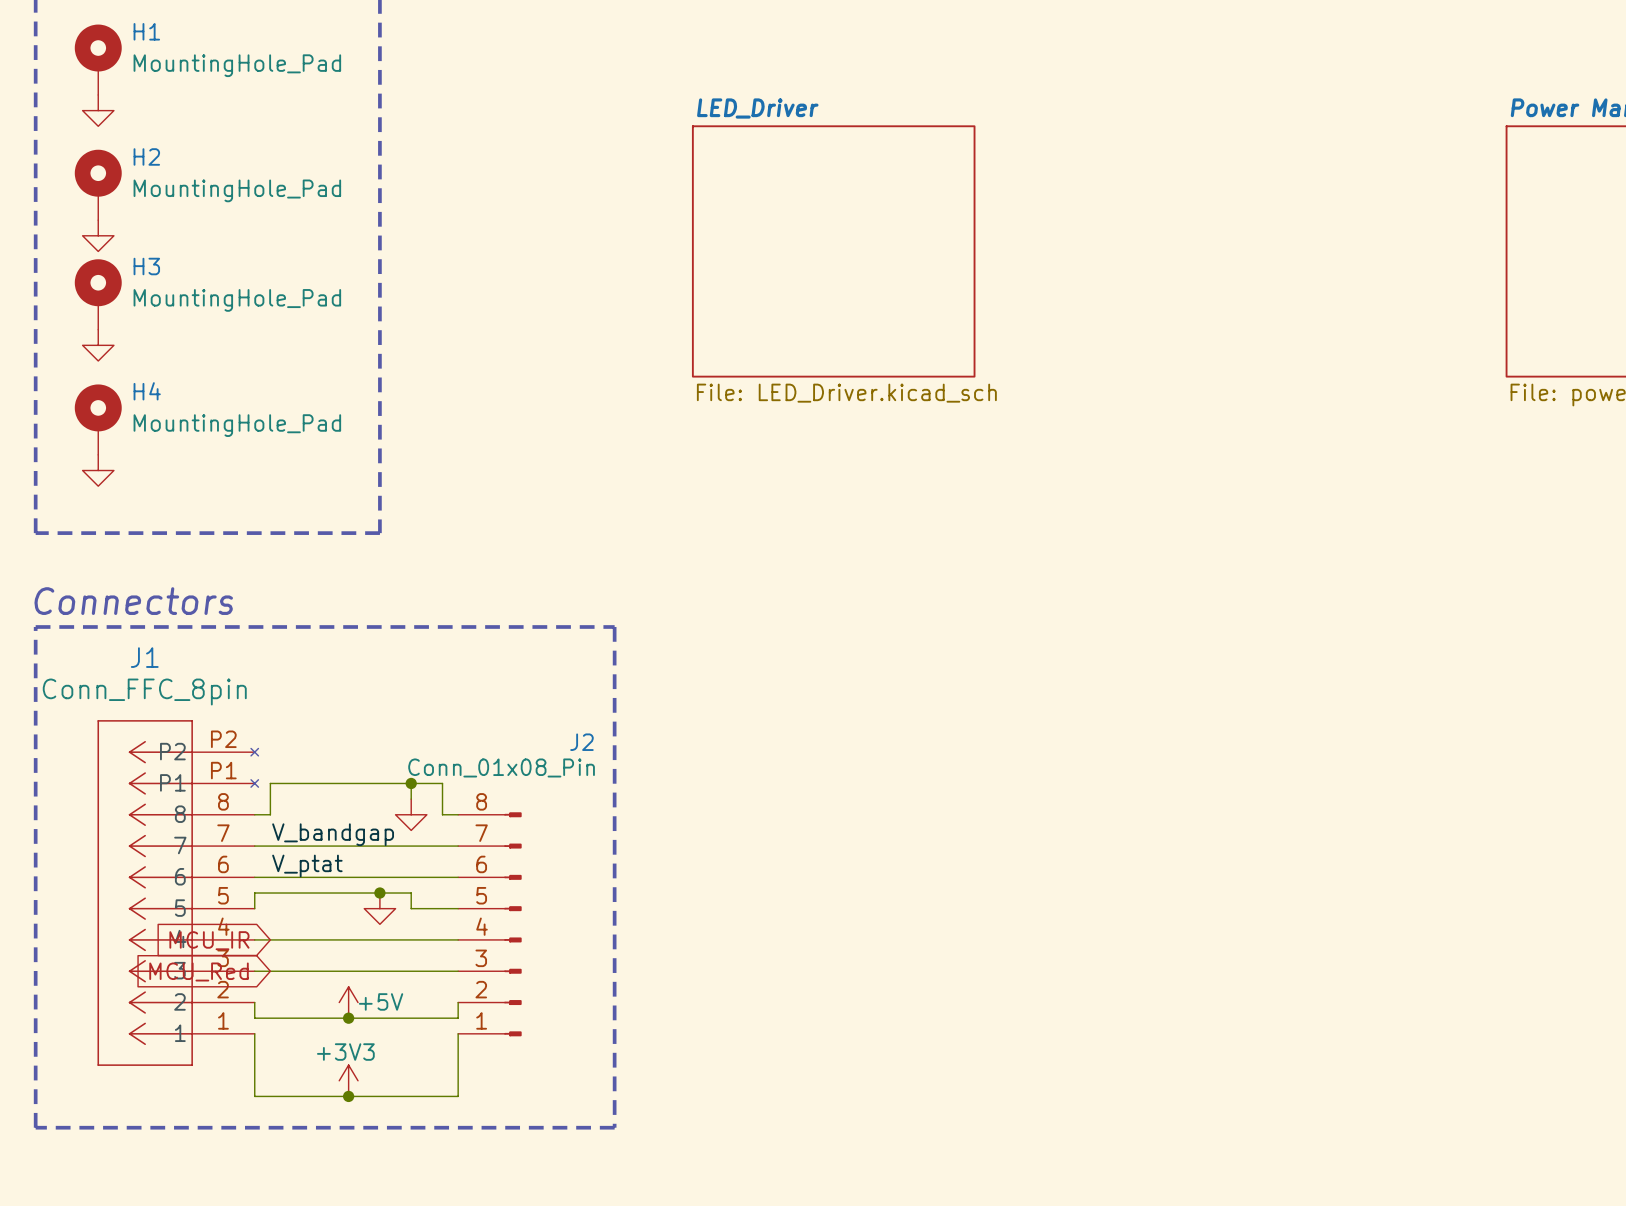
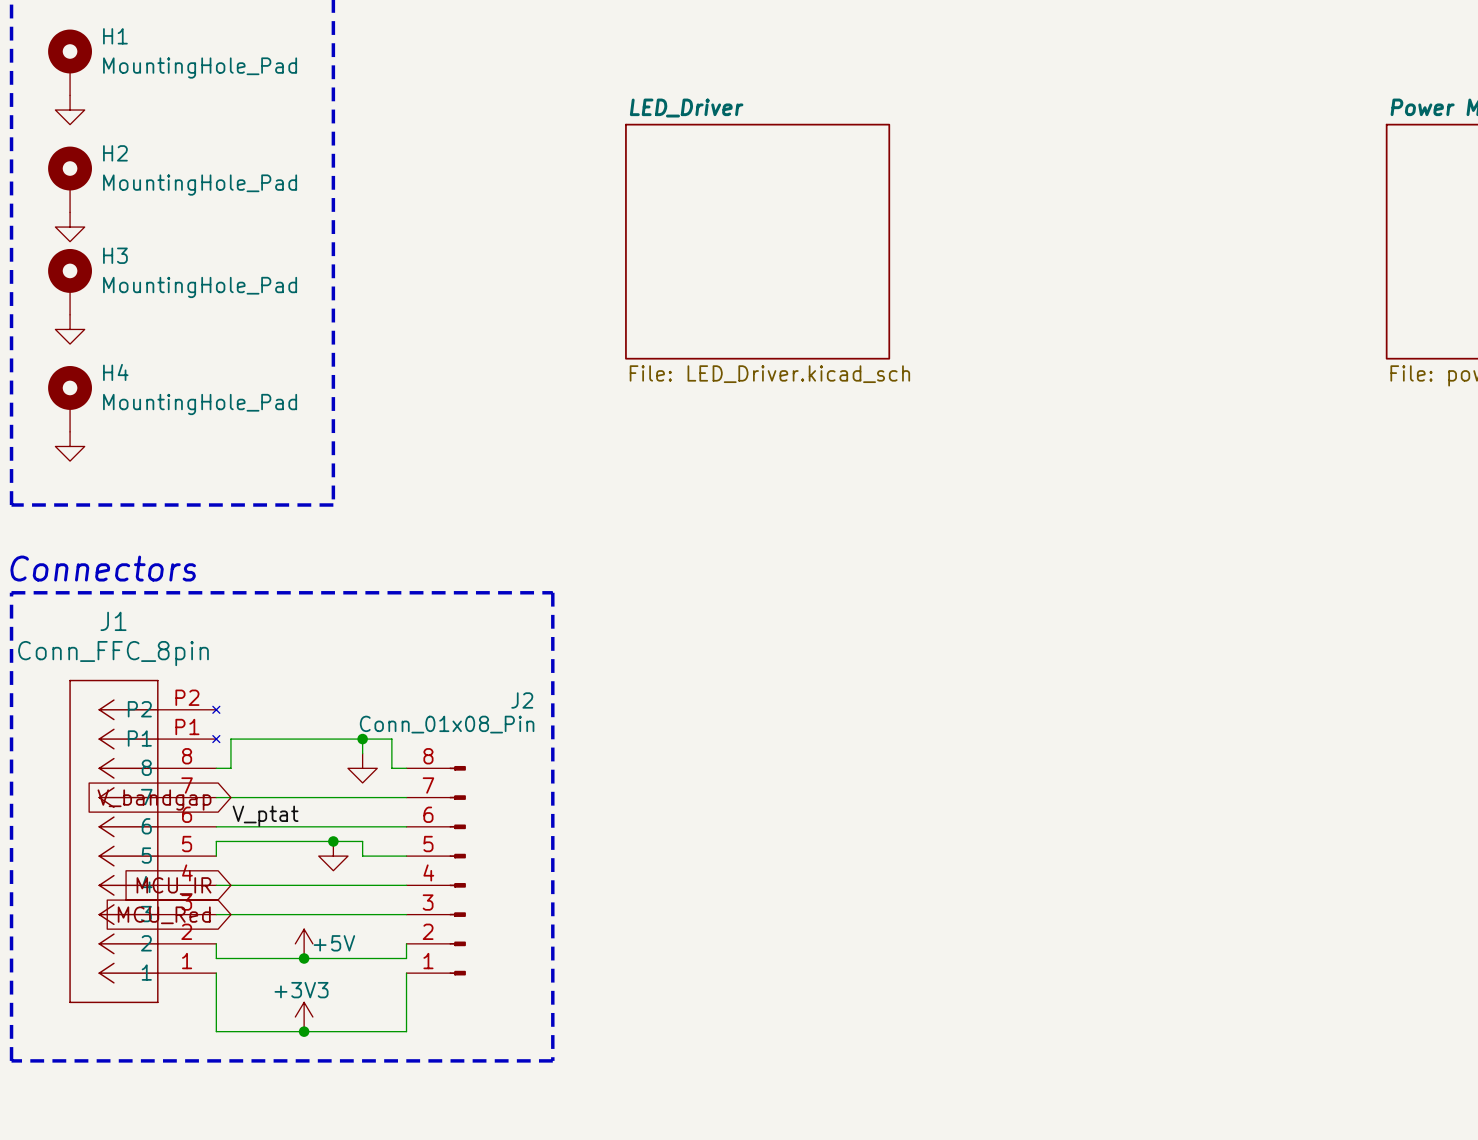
label: V_bandgap (333, 834) -> none
global label: none -> V_bandgap (154, 800)

